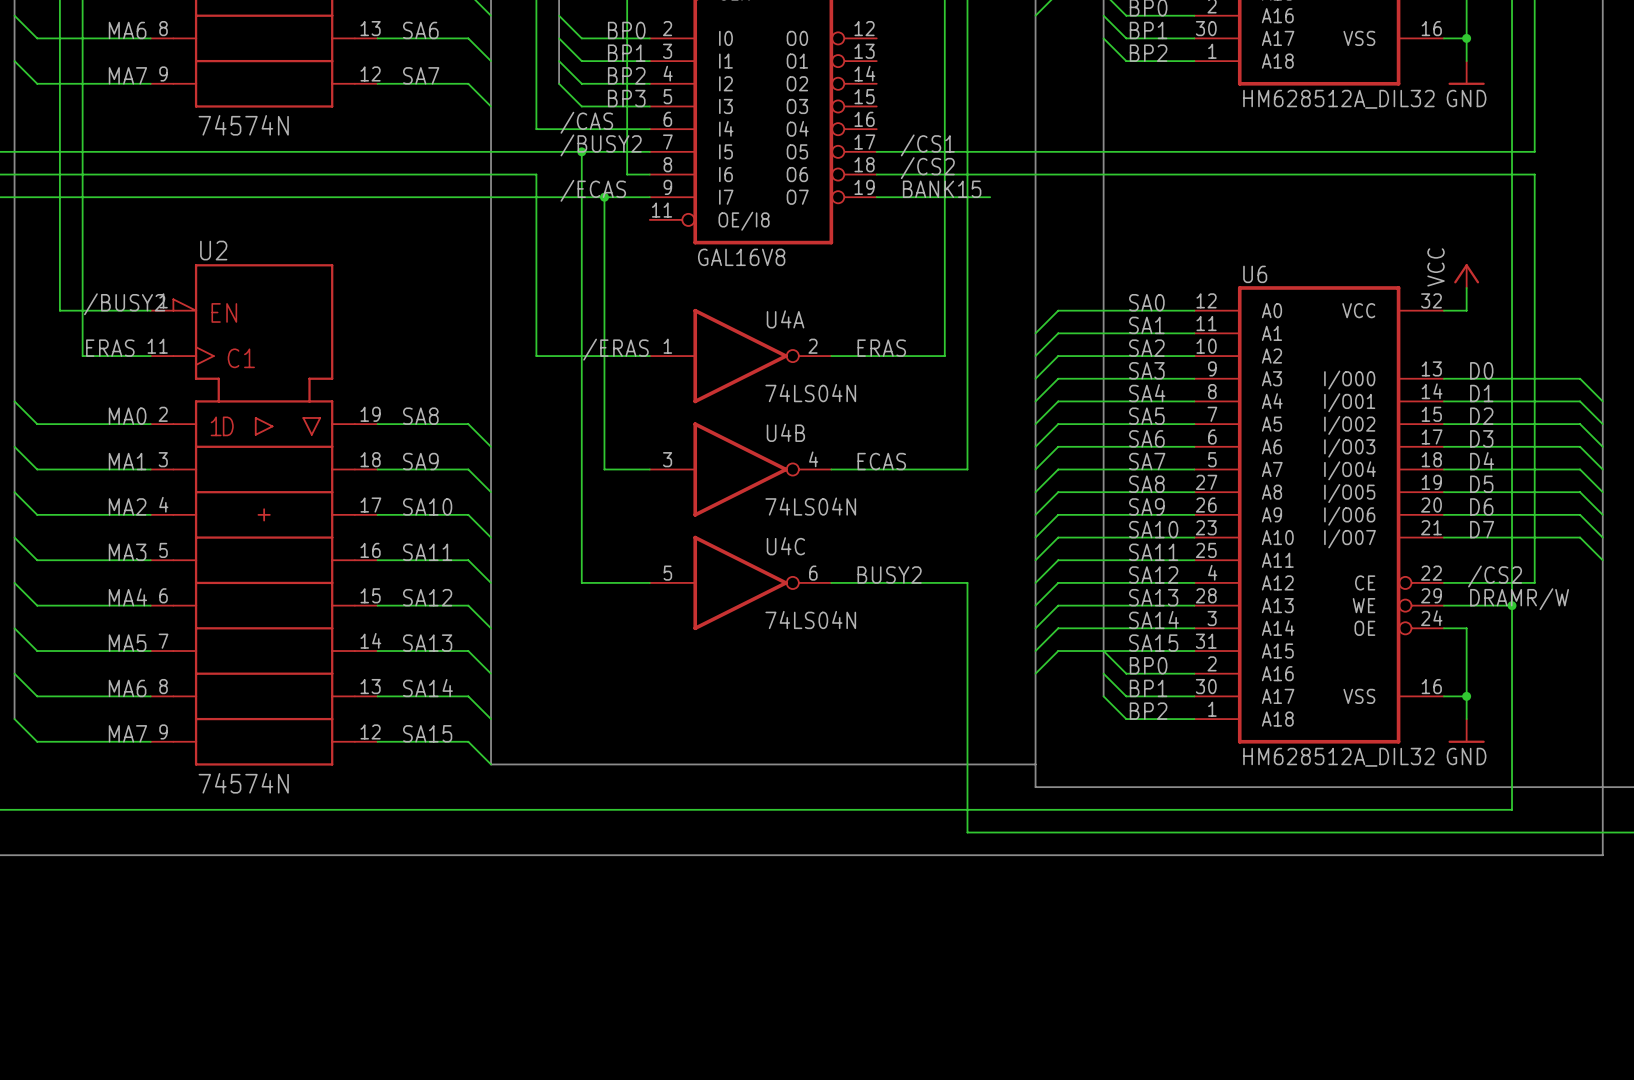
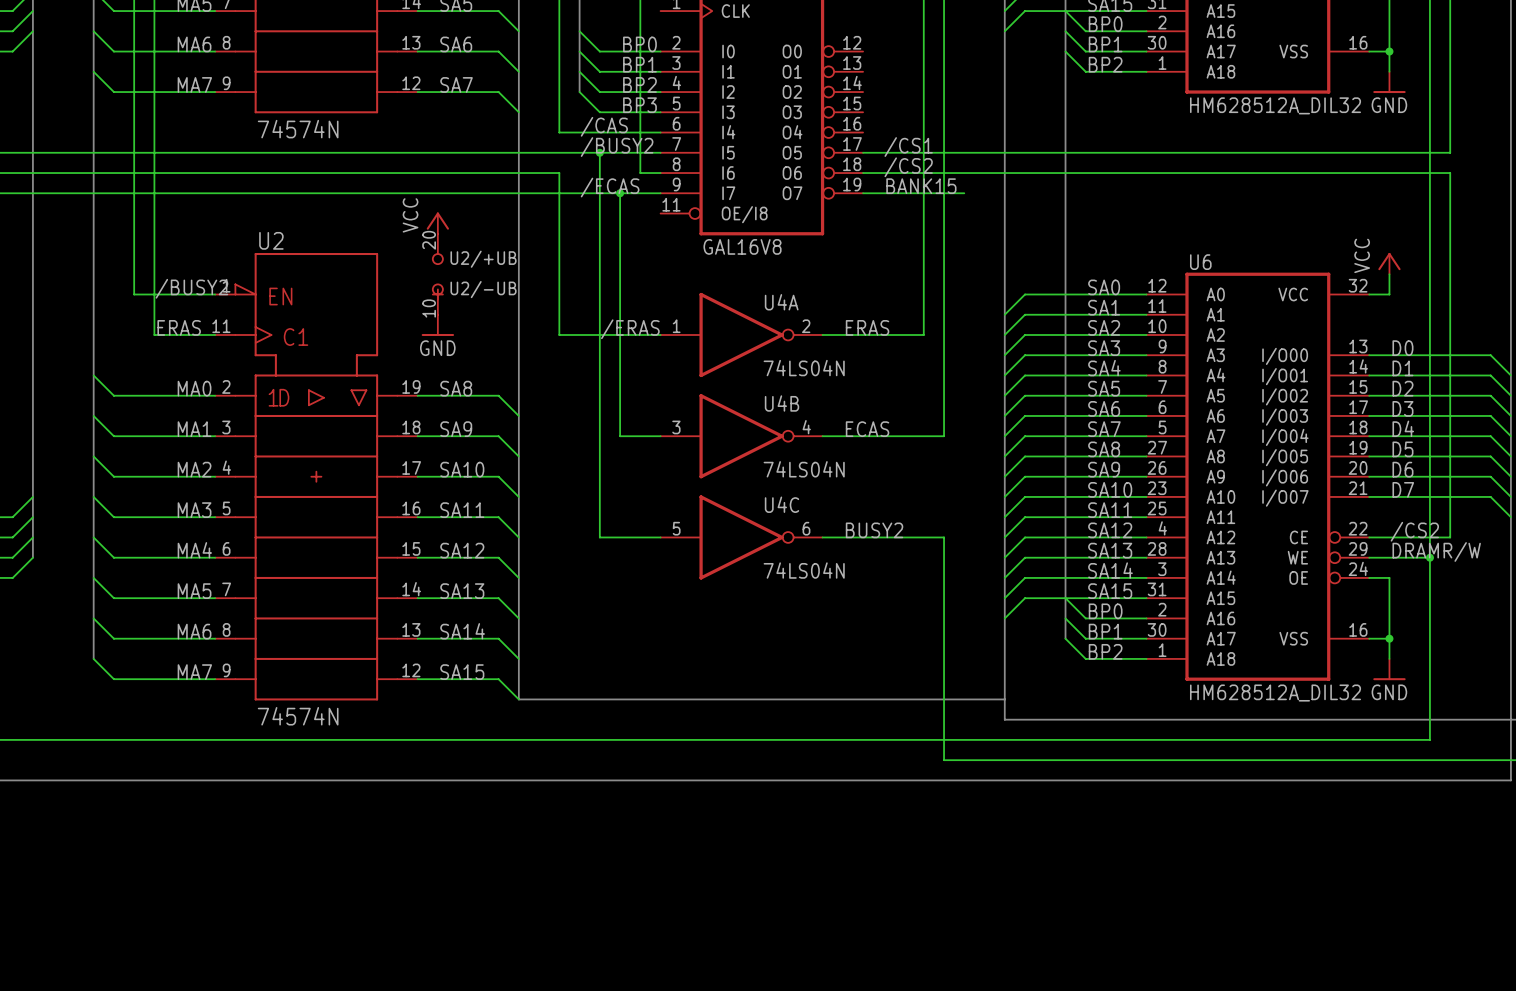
power symbol: none -> VCC (437, 223)
U2/+UB: none -> (437, 249)
U2/-UB: none -> (437, 299)
power symbol: none -> GND (437, 325)

